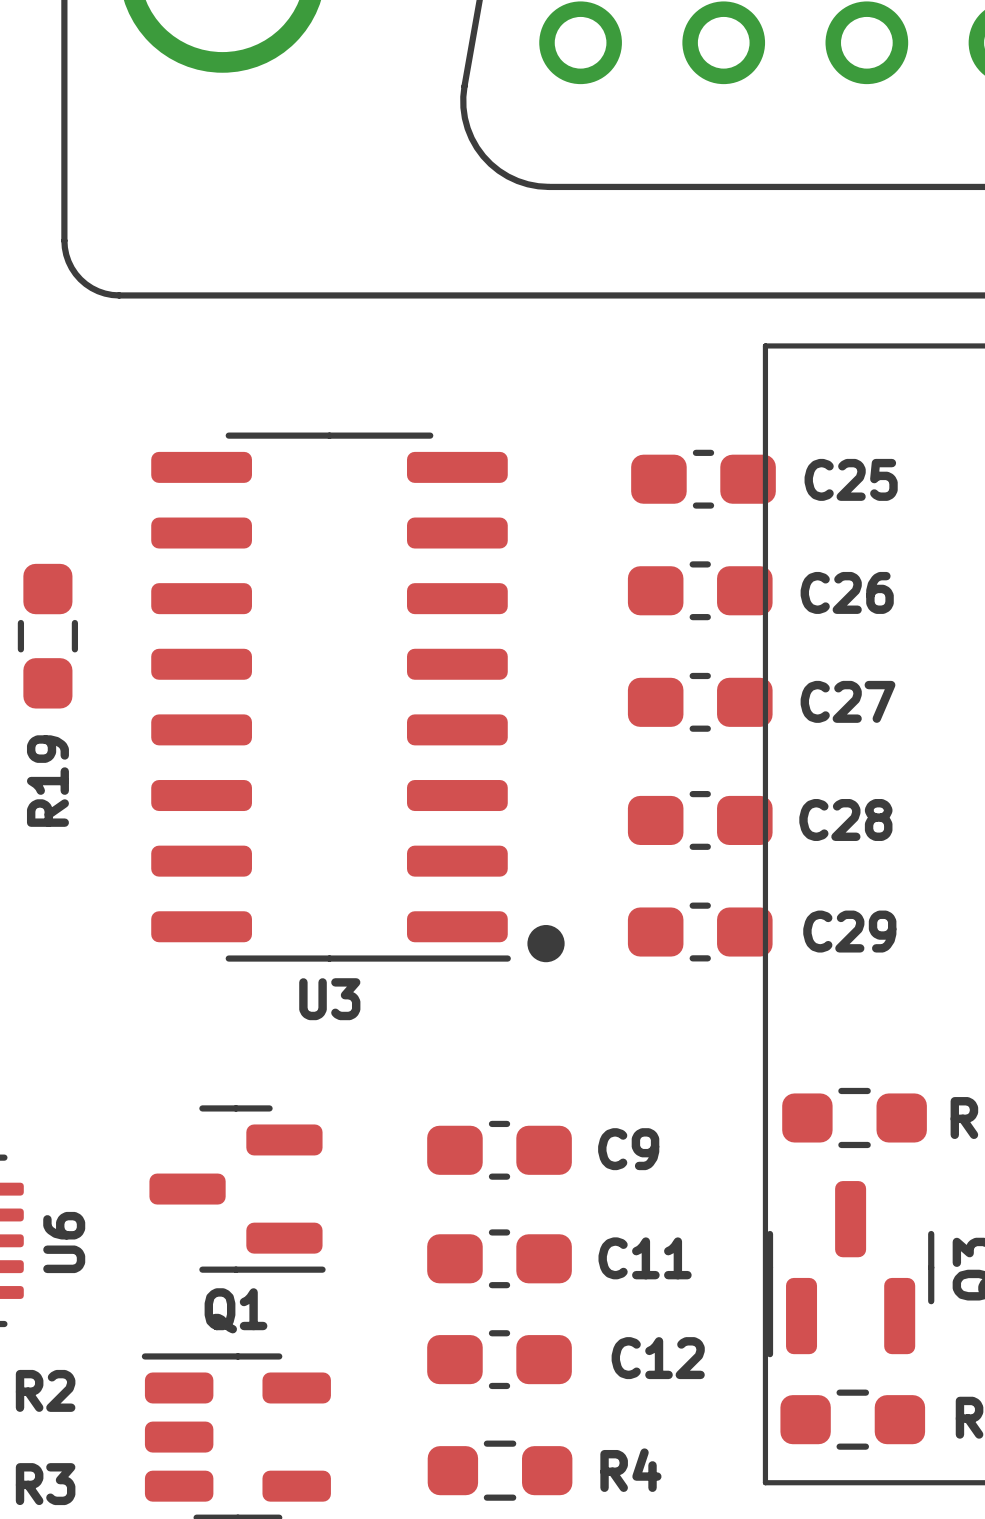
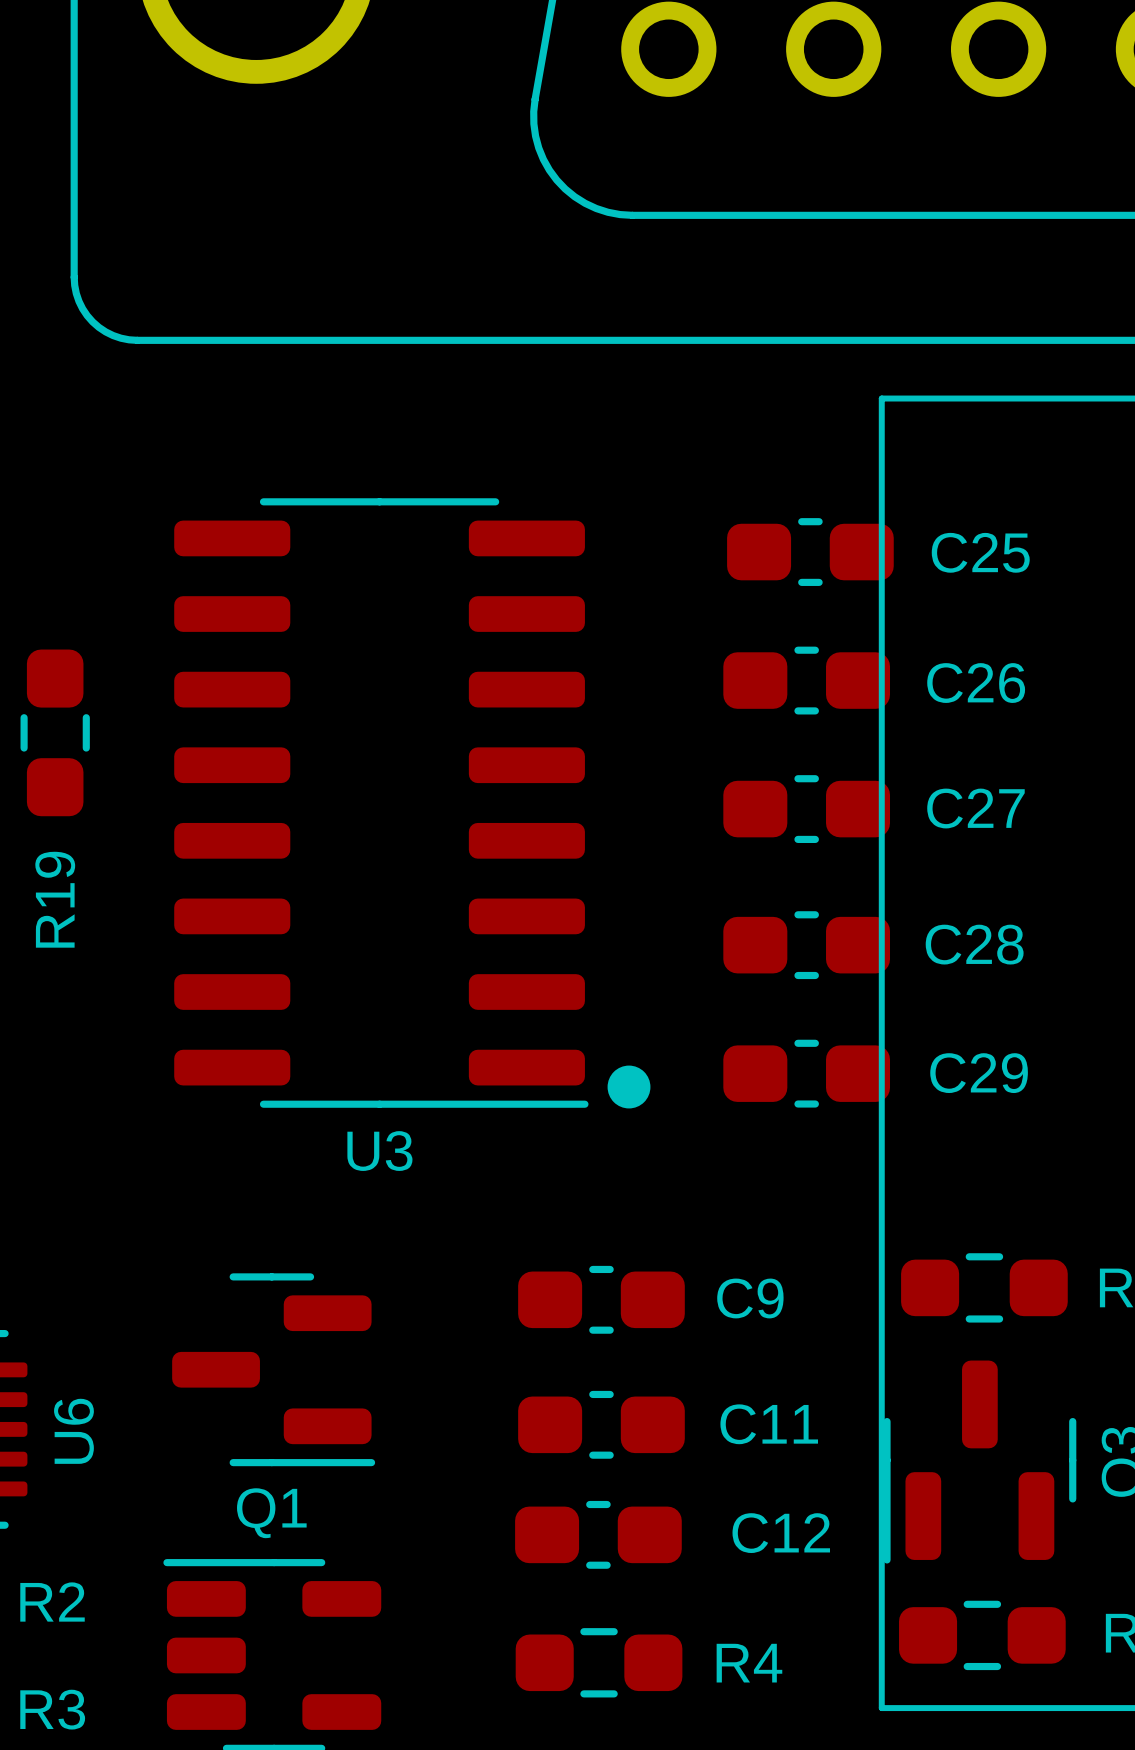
C9 position: (499, 1150) -> (601, 1299)
C11 position: (499, 1258) -> (601, 1424)
C12 position: (499, 1359) -> (598, 1534)
R4 position: (500, 1470) -> (599, 1662)

